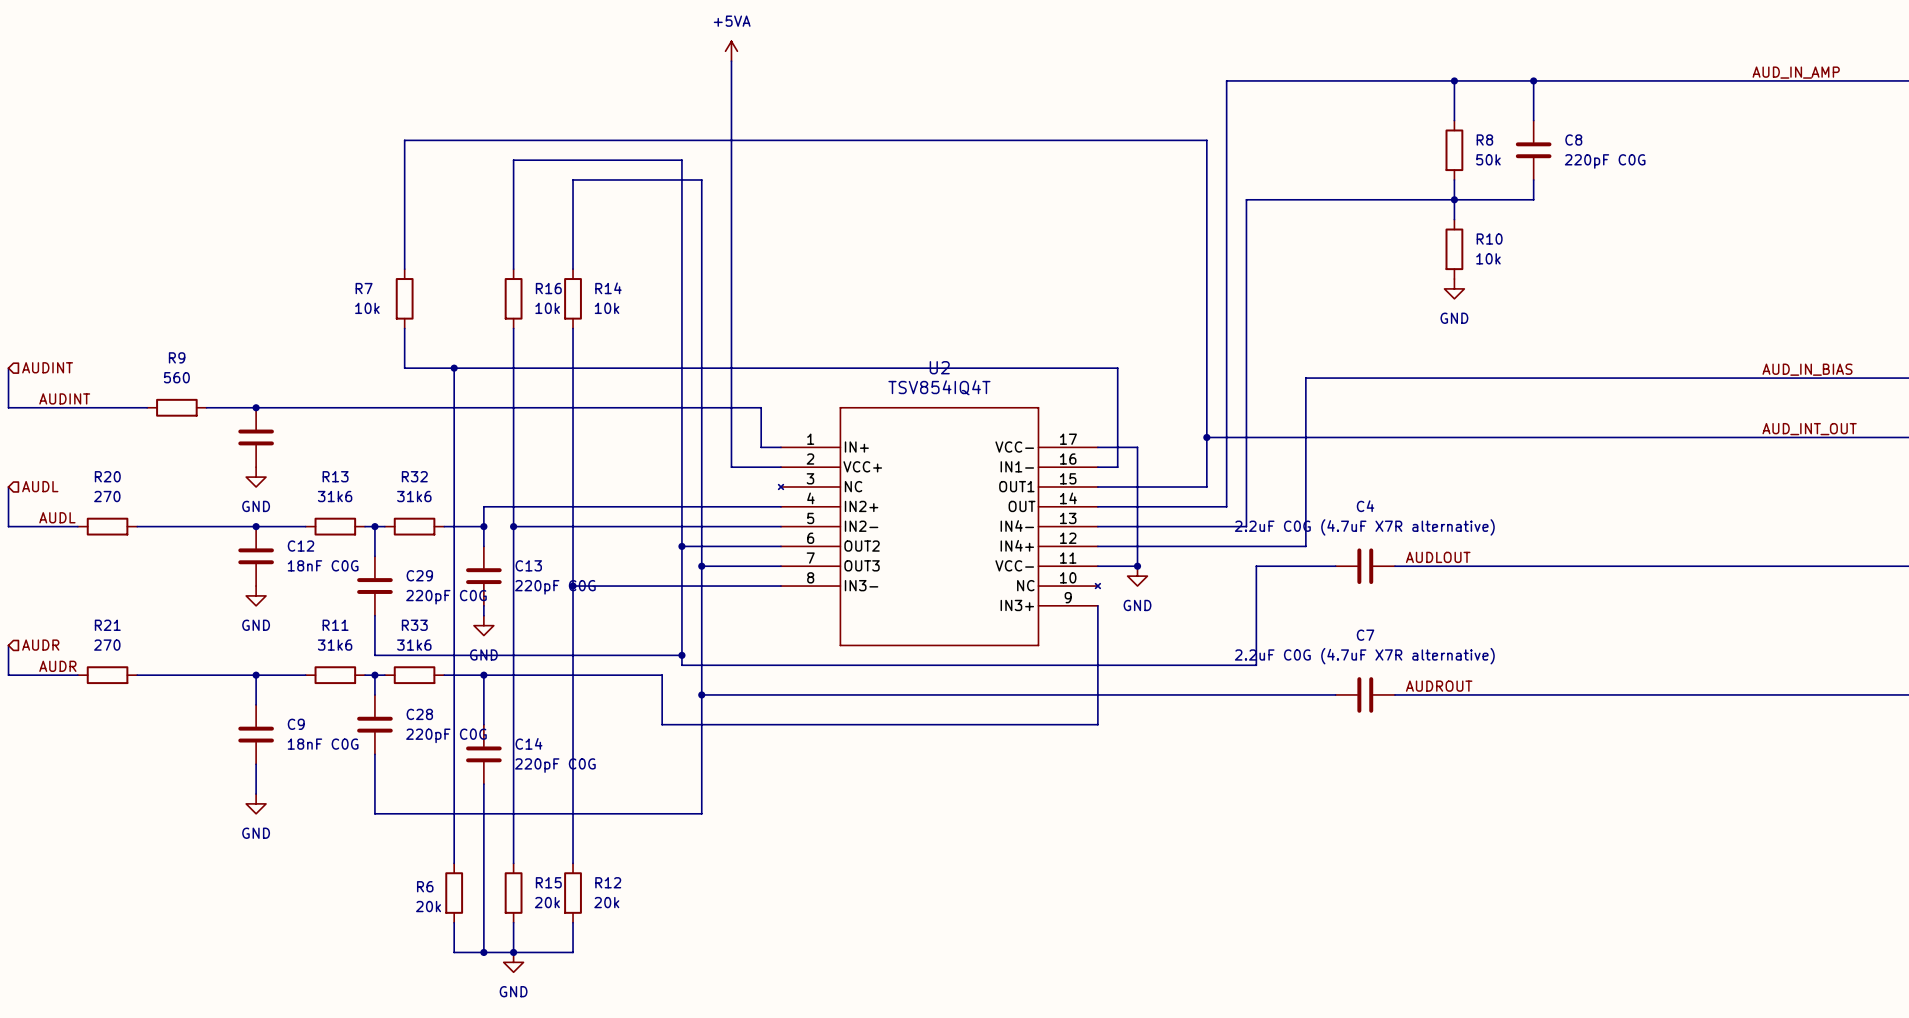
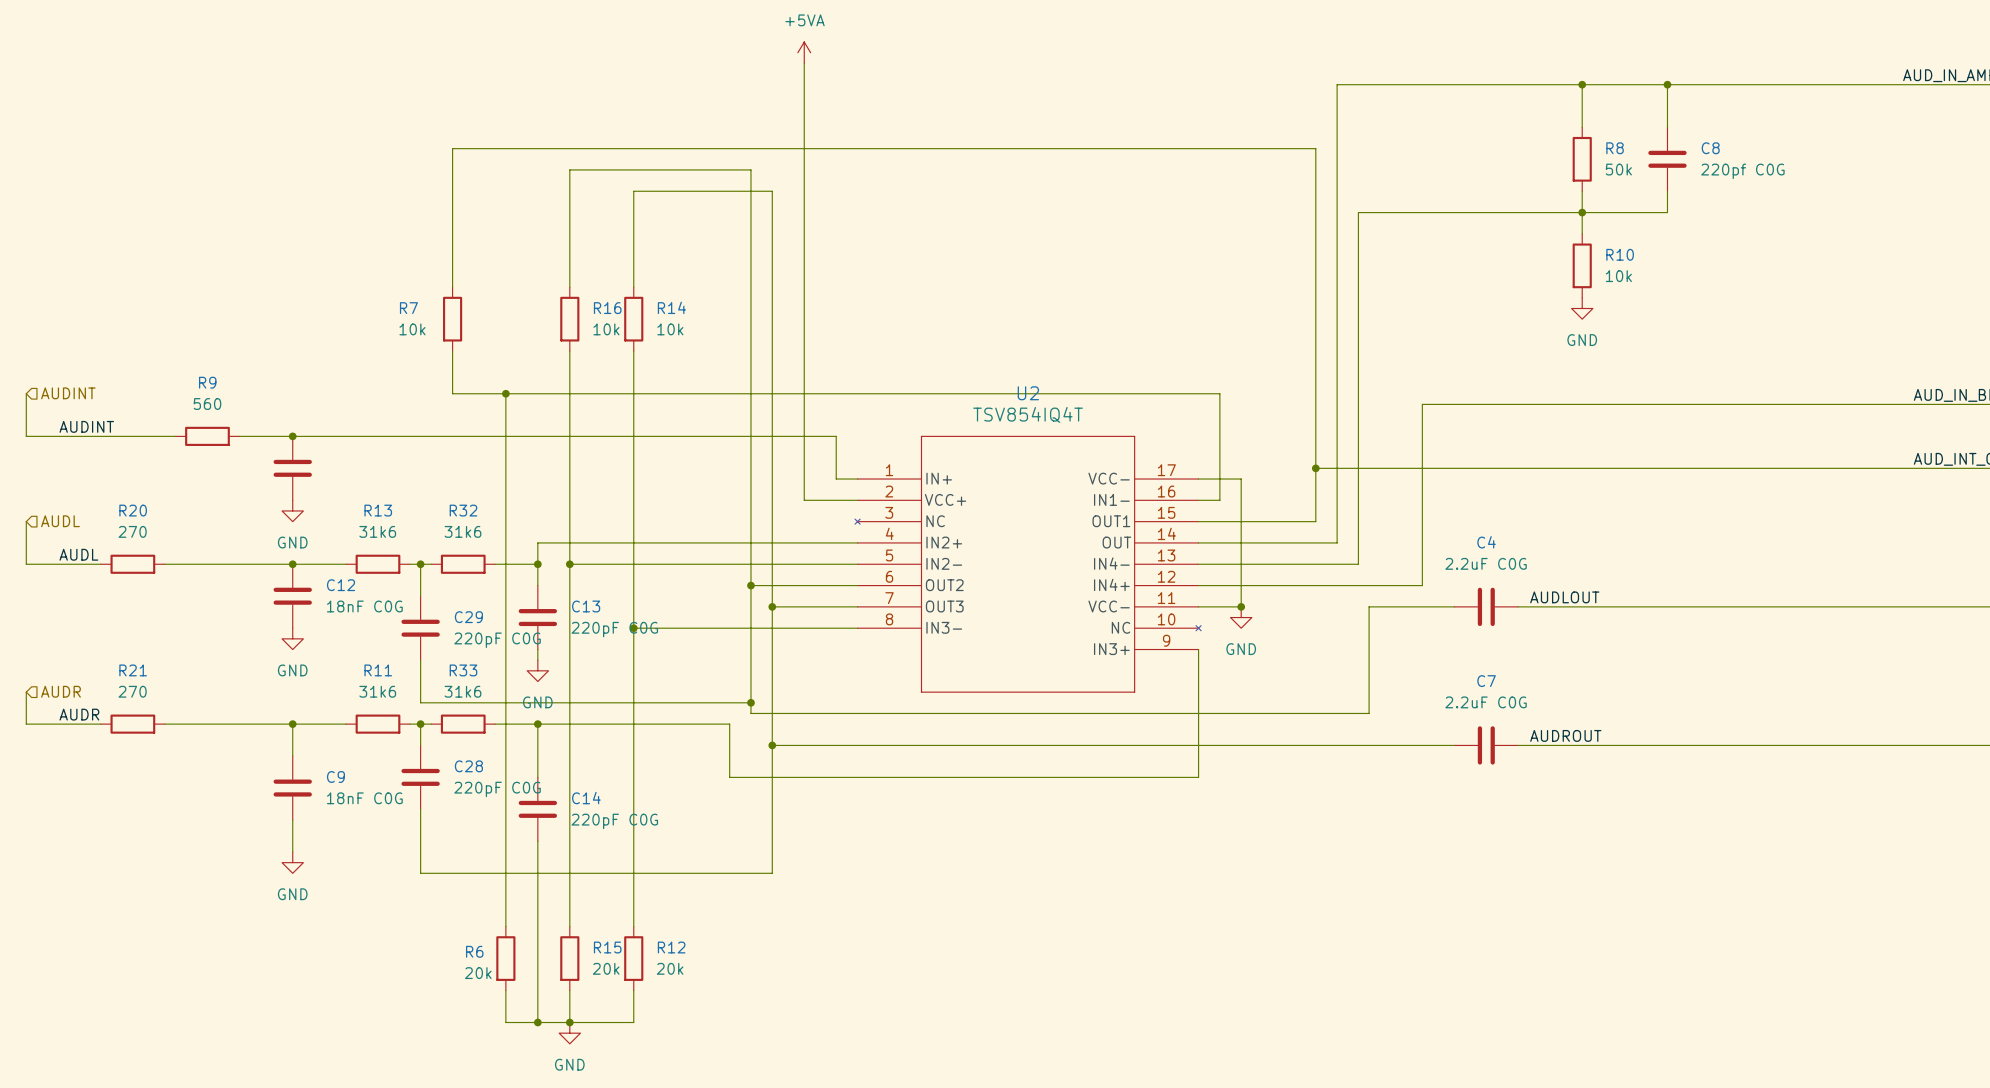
C8 value: 220pF C0G (1605, 161) -> 220pf C0G (1742, 171)
C4 value: 2.2uF C0G (4.7uF X7R alternative) (1364, 527) -> 2.2uF C0G (1486, 563)
C7 value: 2.2uF C0G (4.7uF X7R alternative) (1364, 656) -> 2.2uF C0G (1486, 702)

